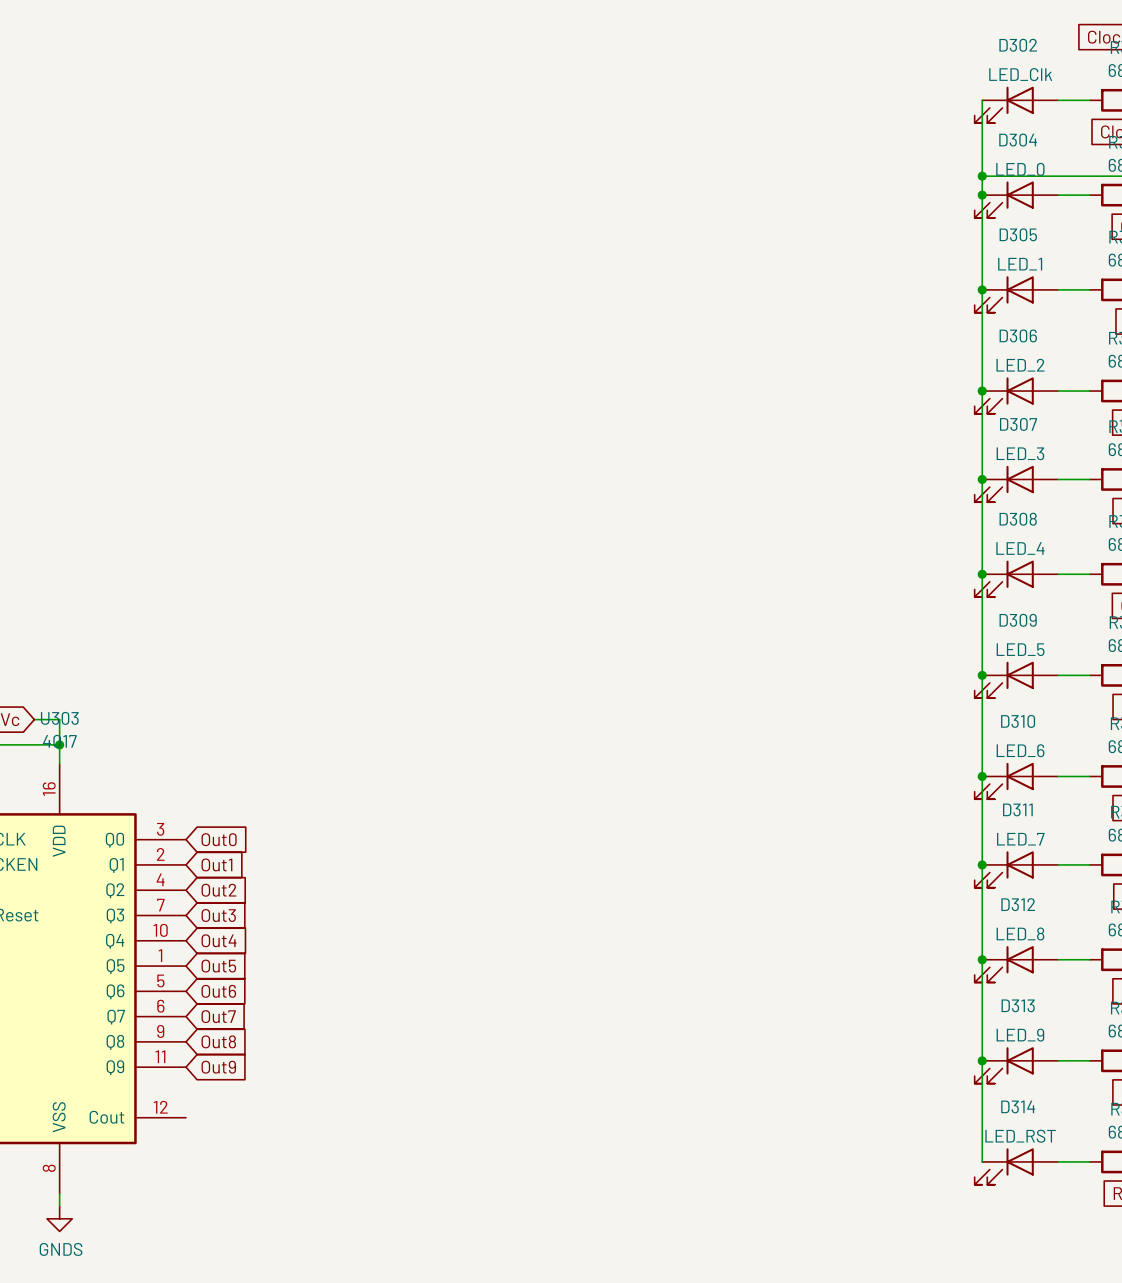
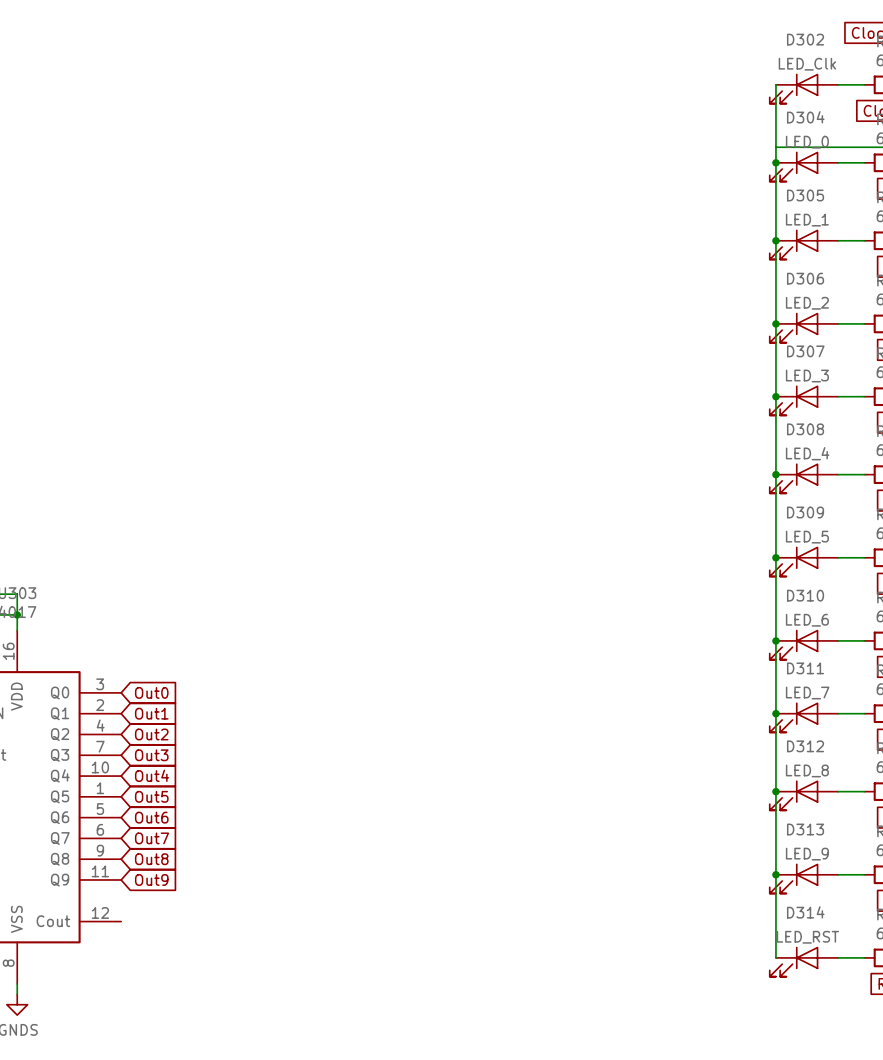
junction: (982, 176) -> none

